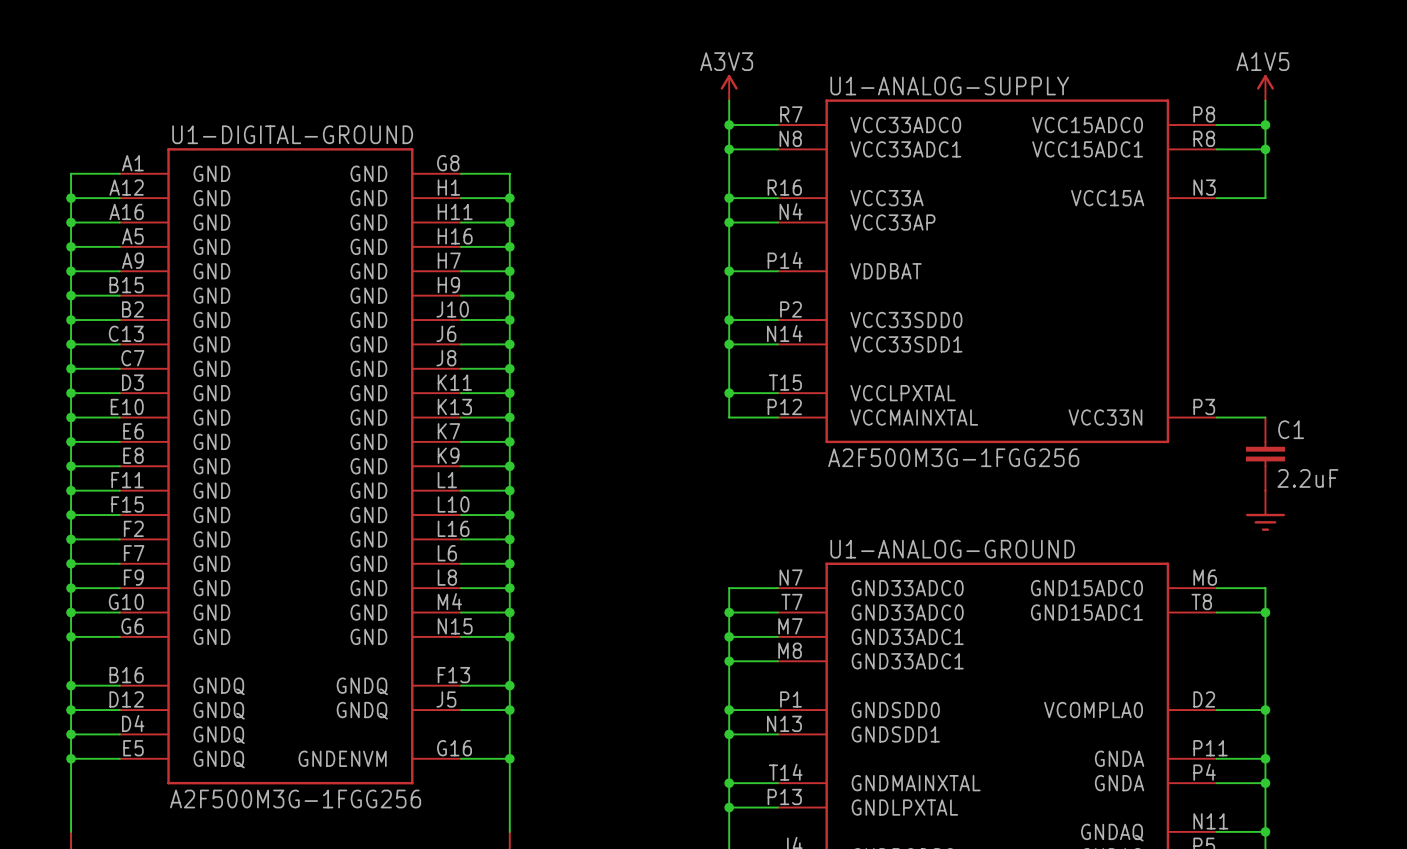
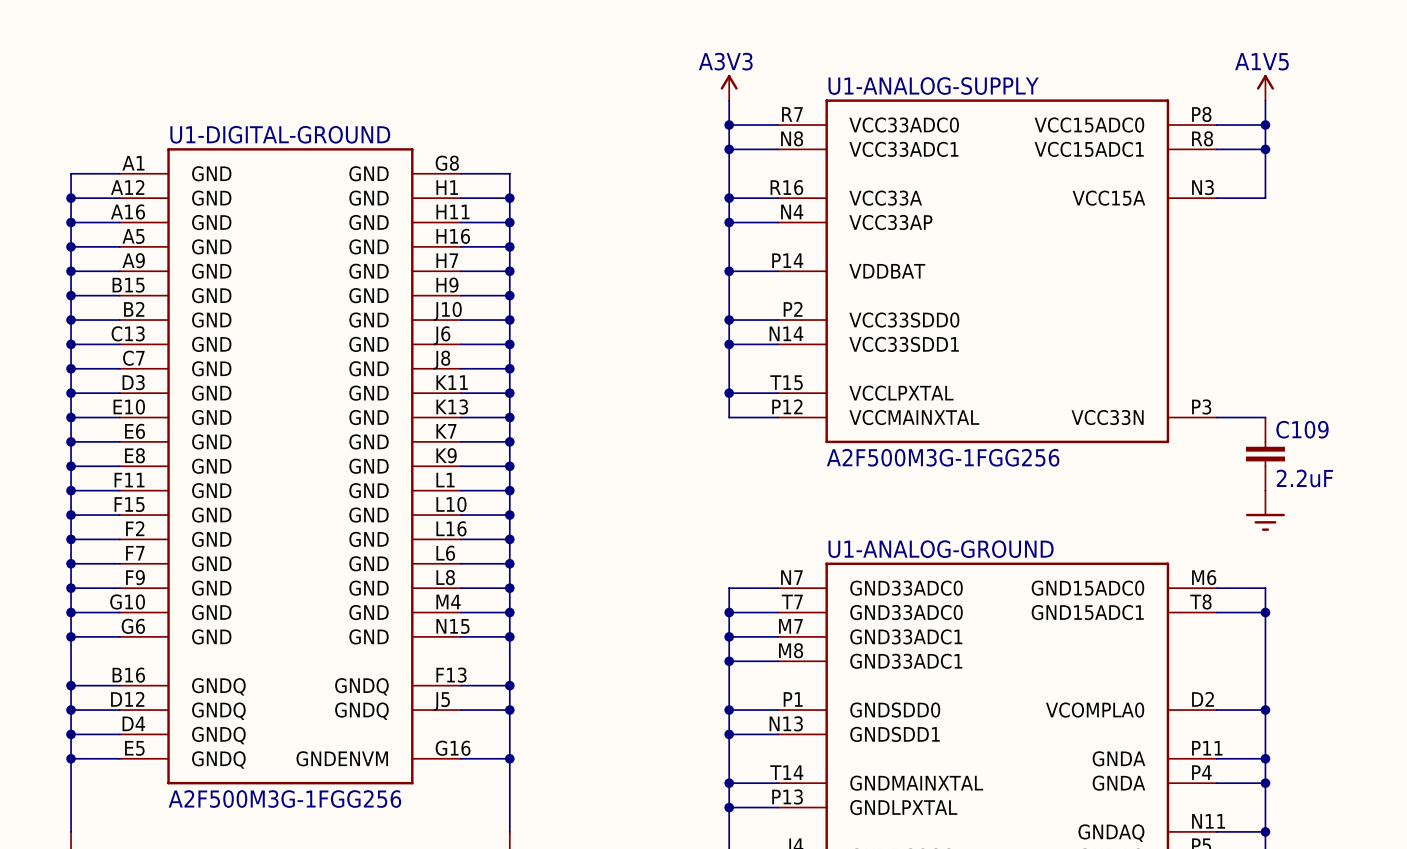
C1 name: C1 (1291, 429) -> C109 (1302, 429)

